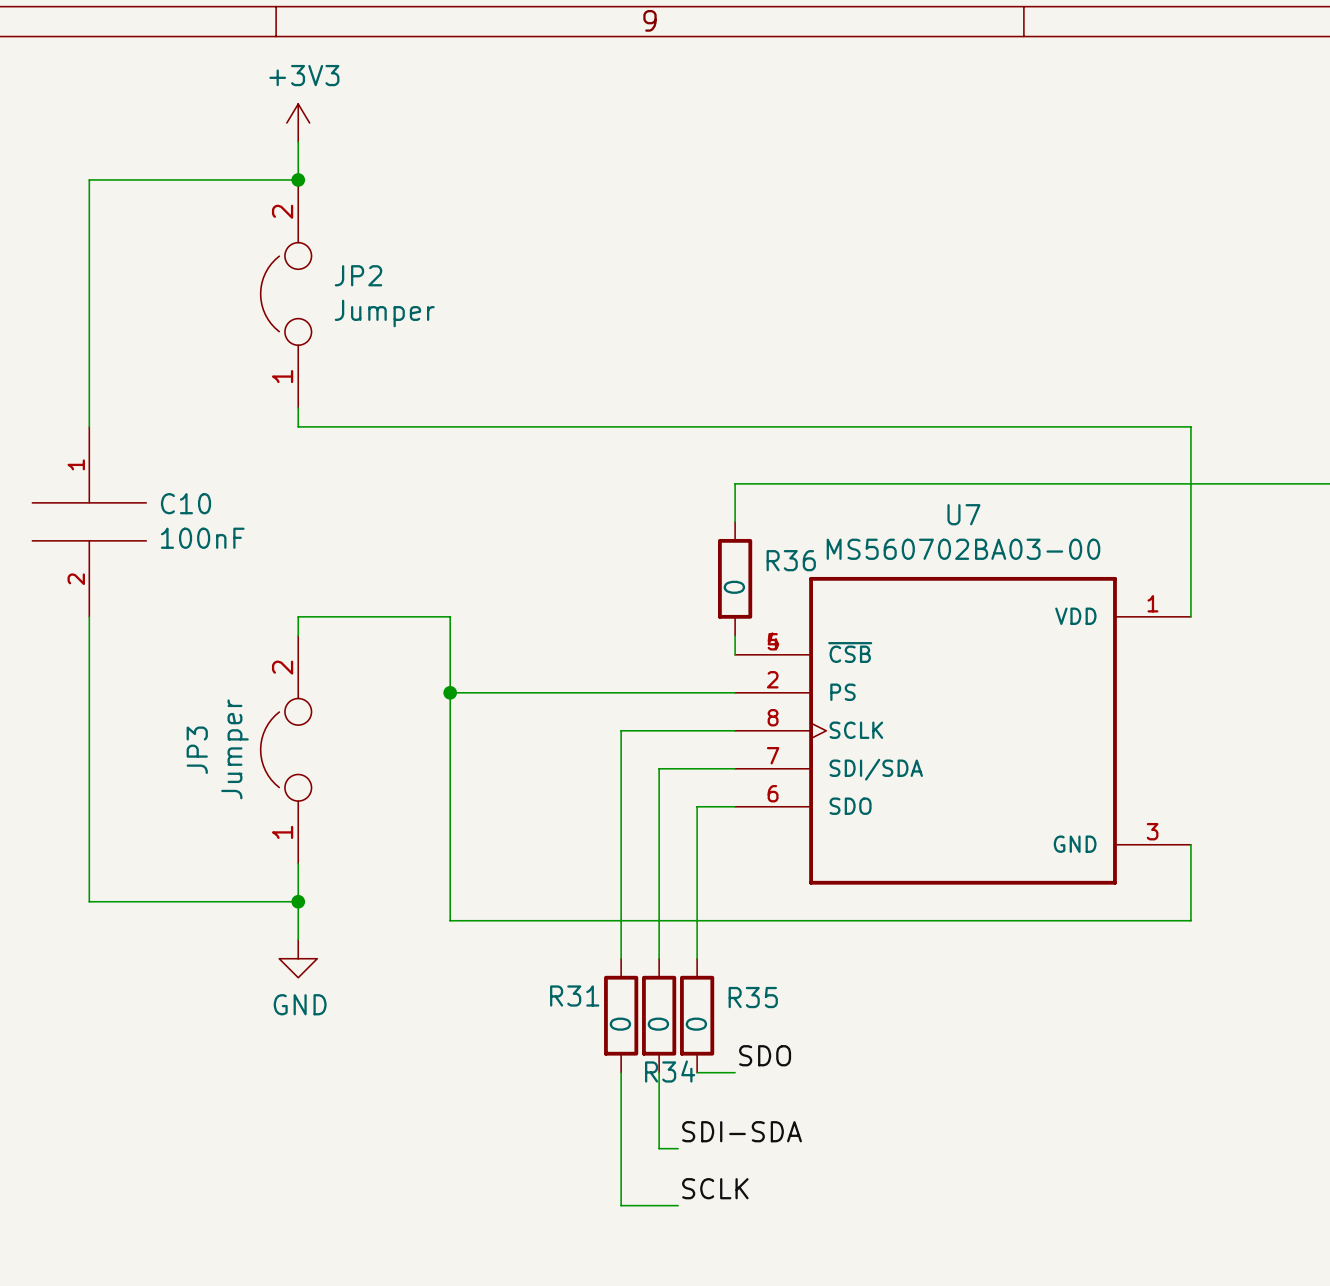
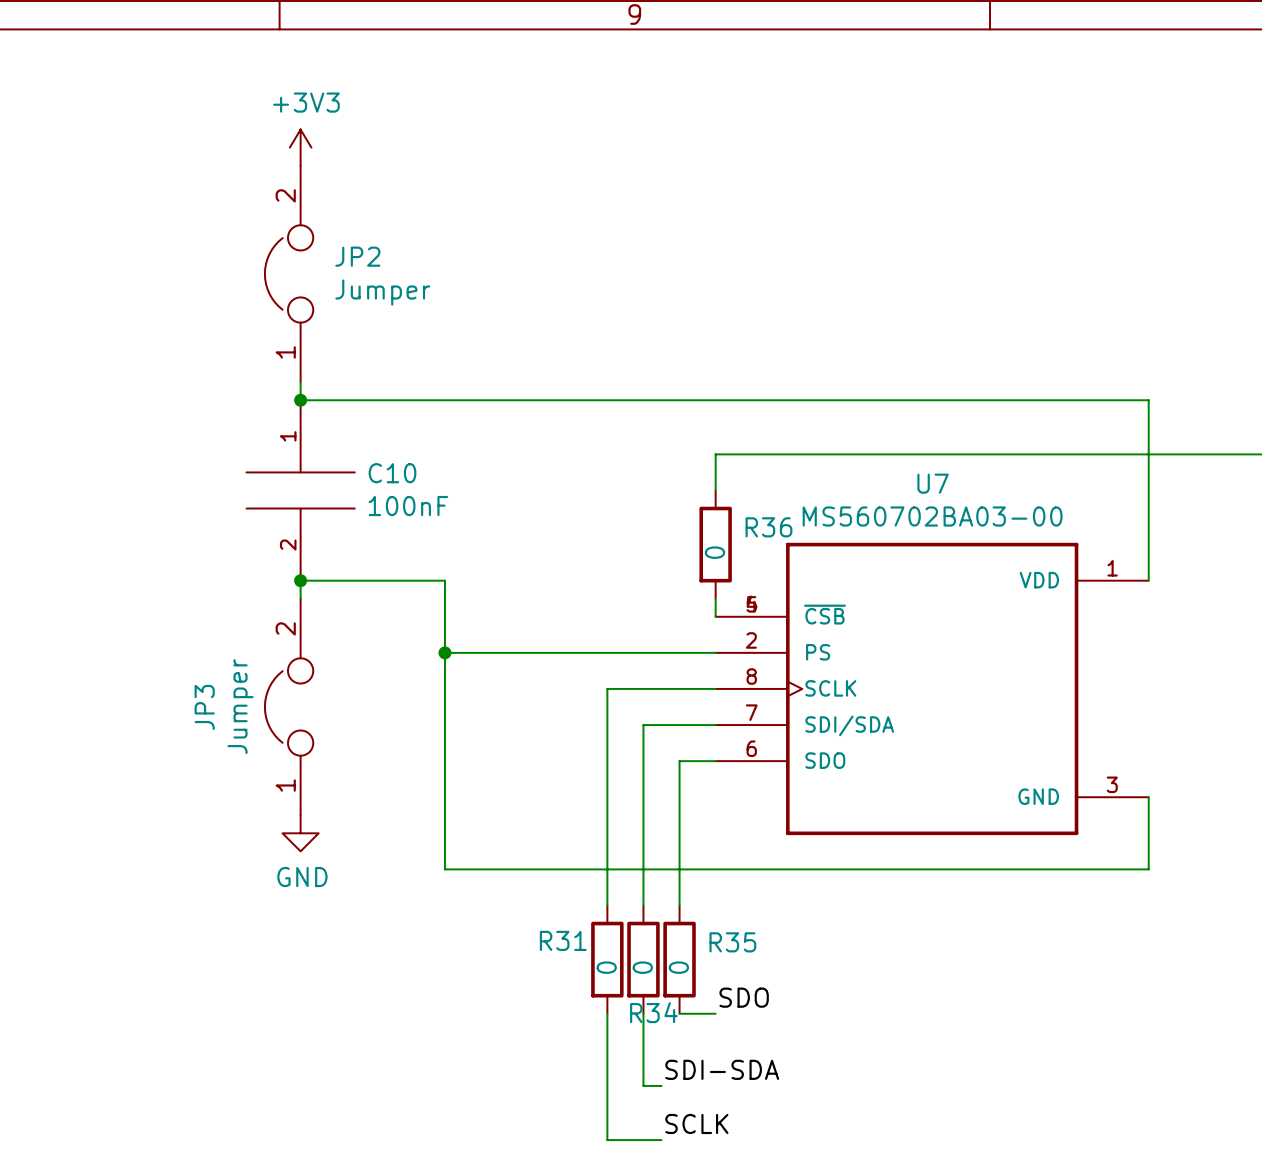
power symbol position: +3V3 (298, 123) -> +3V3 (300, 147)
wire: (298, 141) (298, 179) (89, 179) (89, 426) -> none
junction: (298, 179) -> none
junction: none -> (300, 400)
C10 position: (89, 521) -> (300, 490)
wire: (89, 616) (89, 901) (298, 901) -> none
junction: none -> (300, 580)
wire: (298, 863) (298, 939) -> none
junction: (298, 901) -> none
power symbol position: GND (298, 958) -> GND (300, 833)

